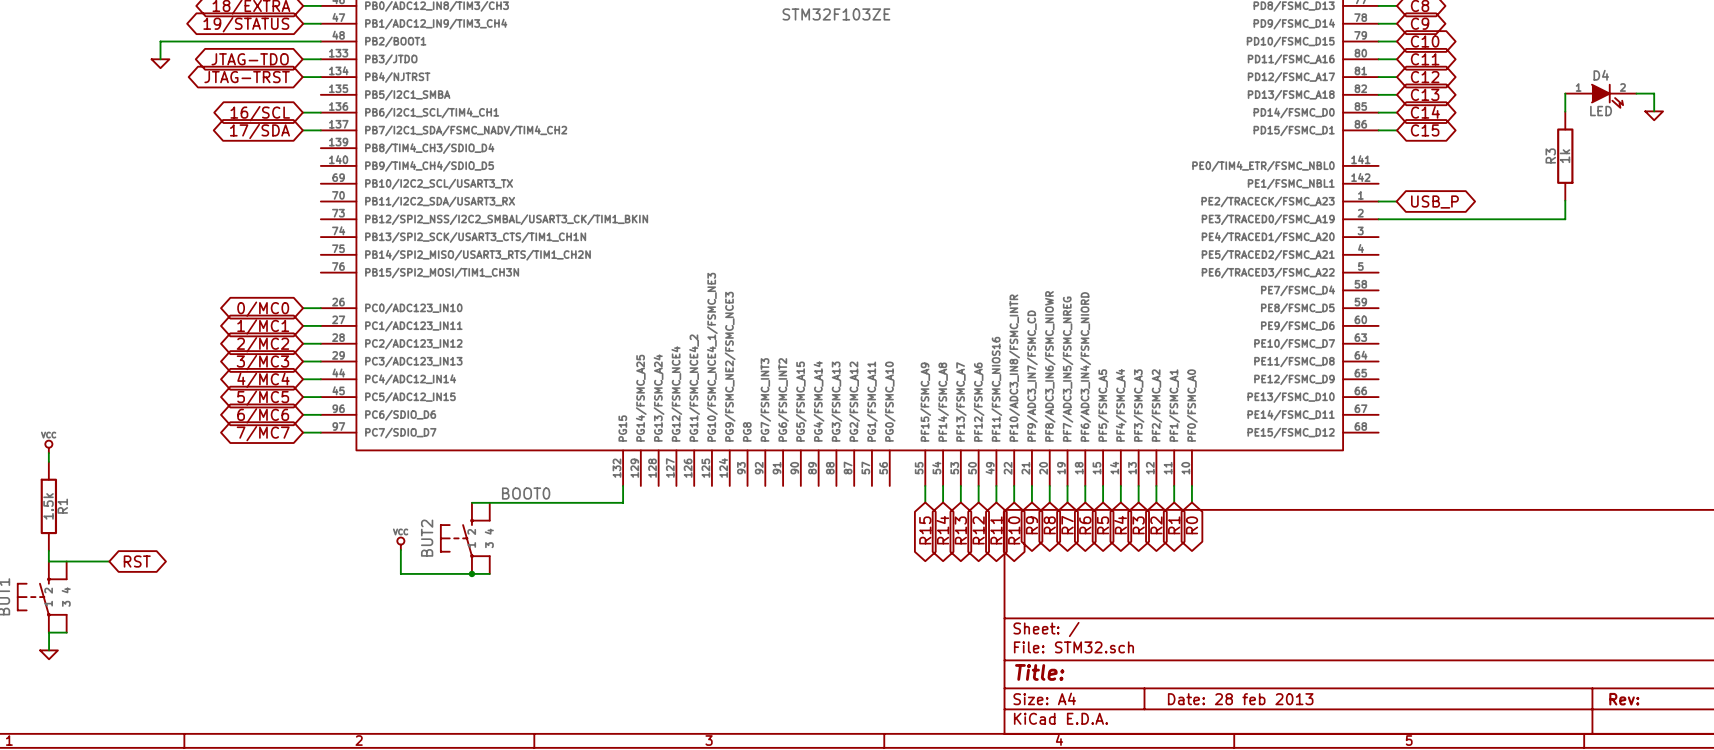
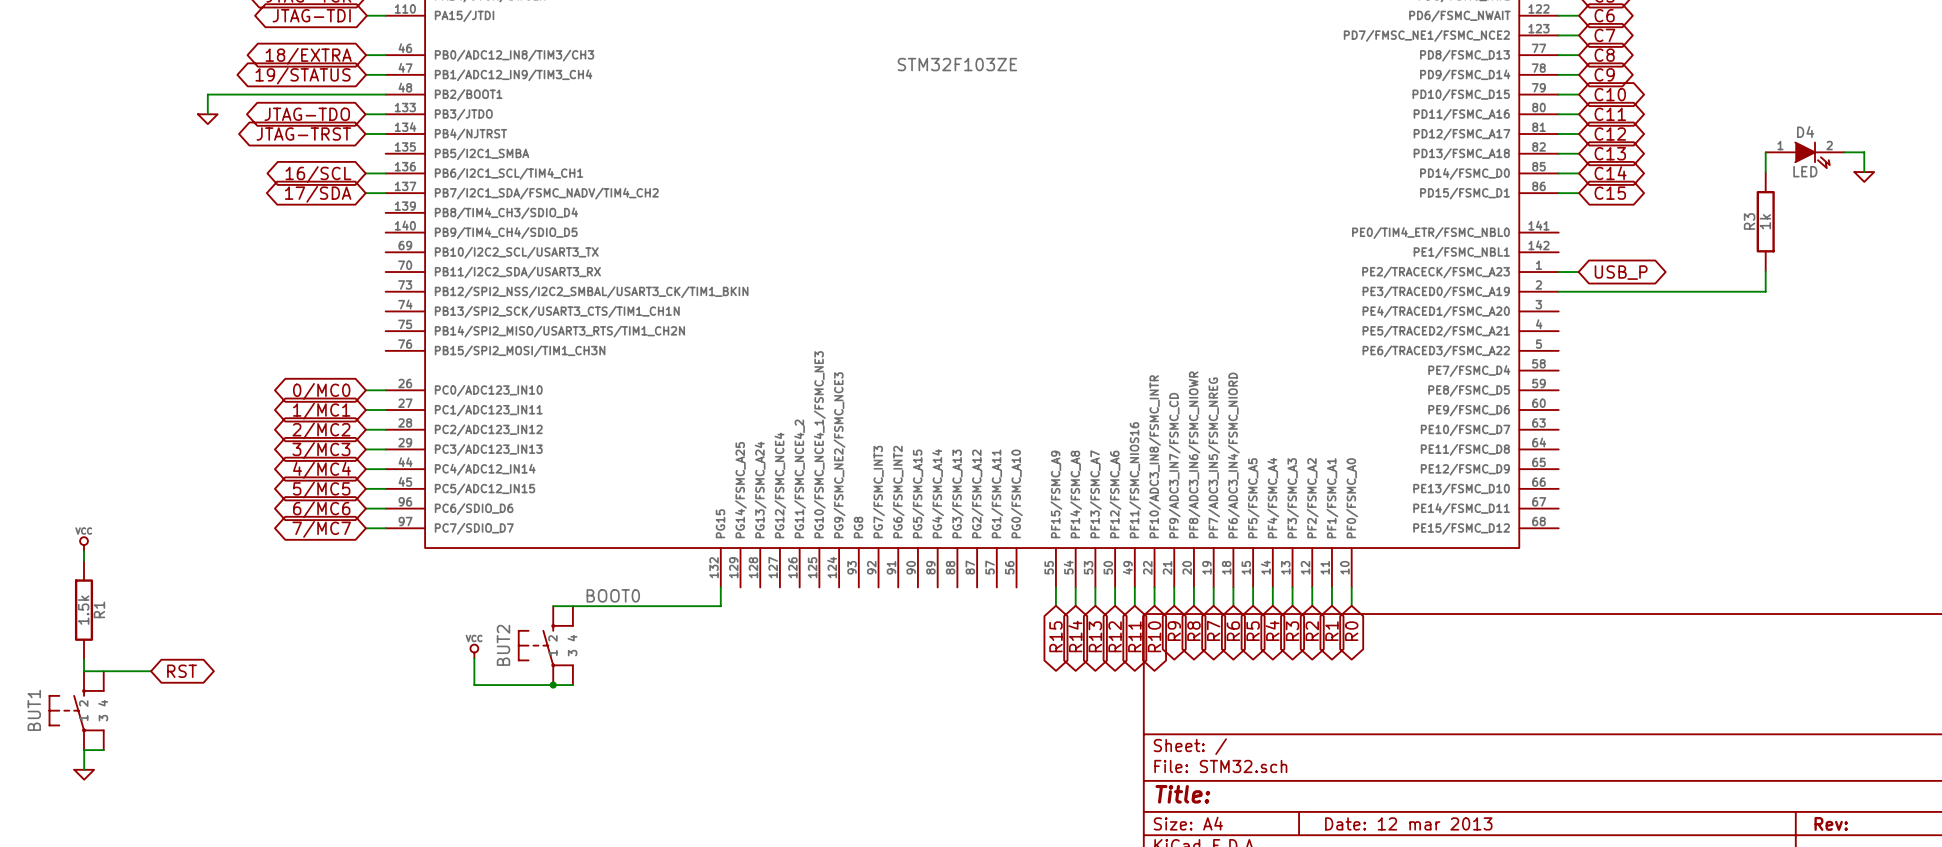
title block: Date: 28 feb 2013 (1240, 699) -> Date: 12 mar 2013 (1408, 823)

